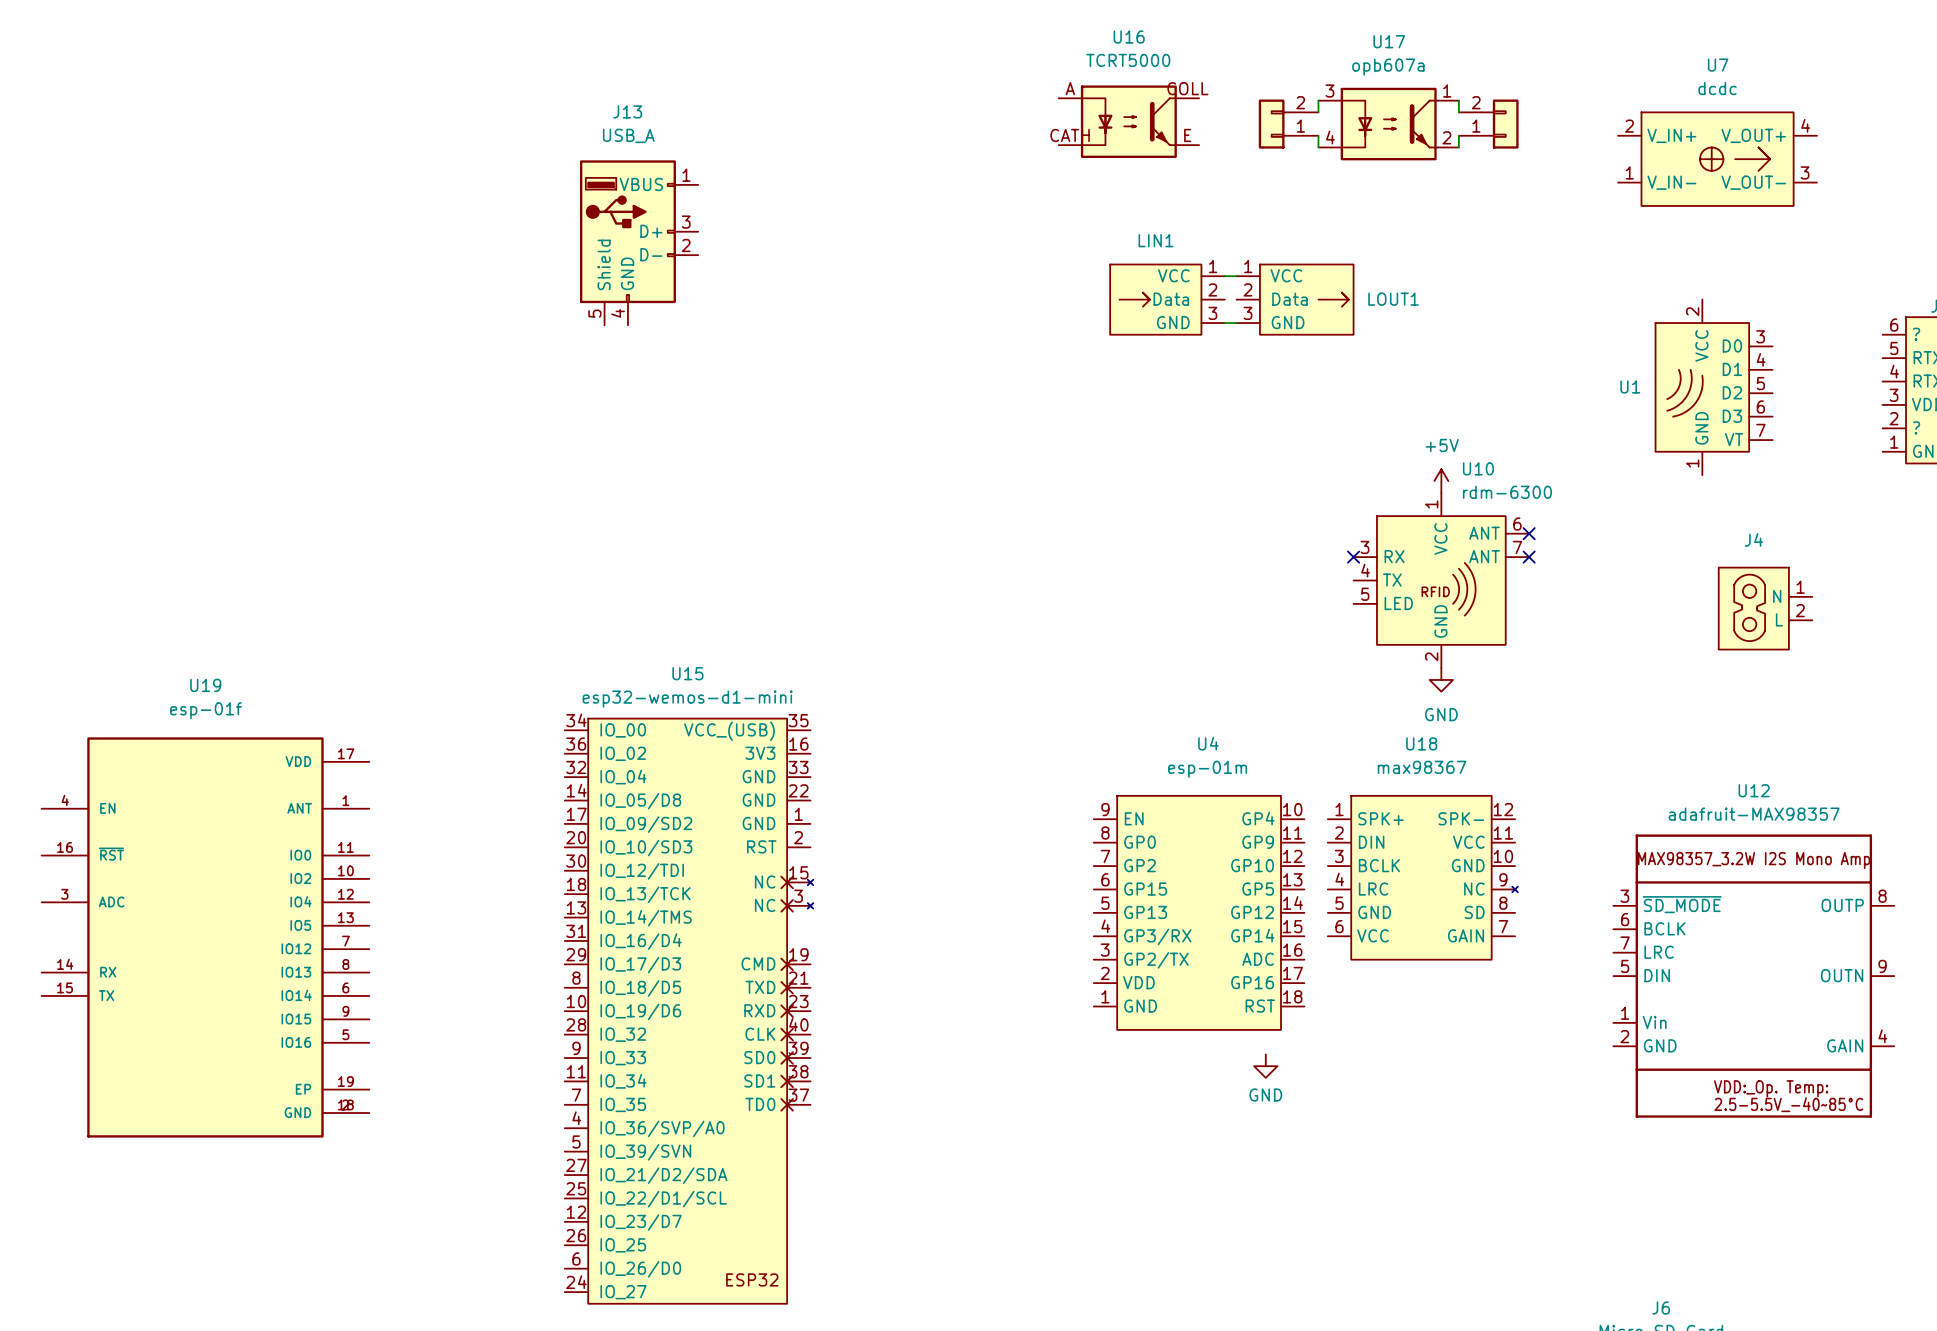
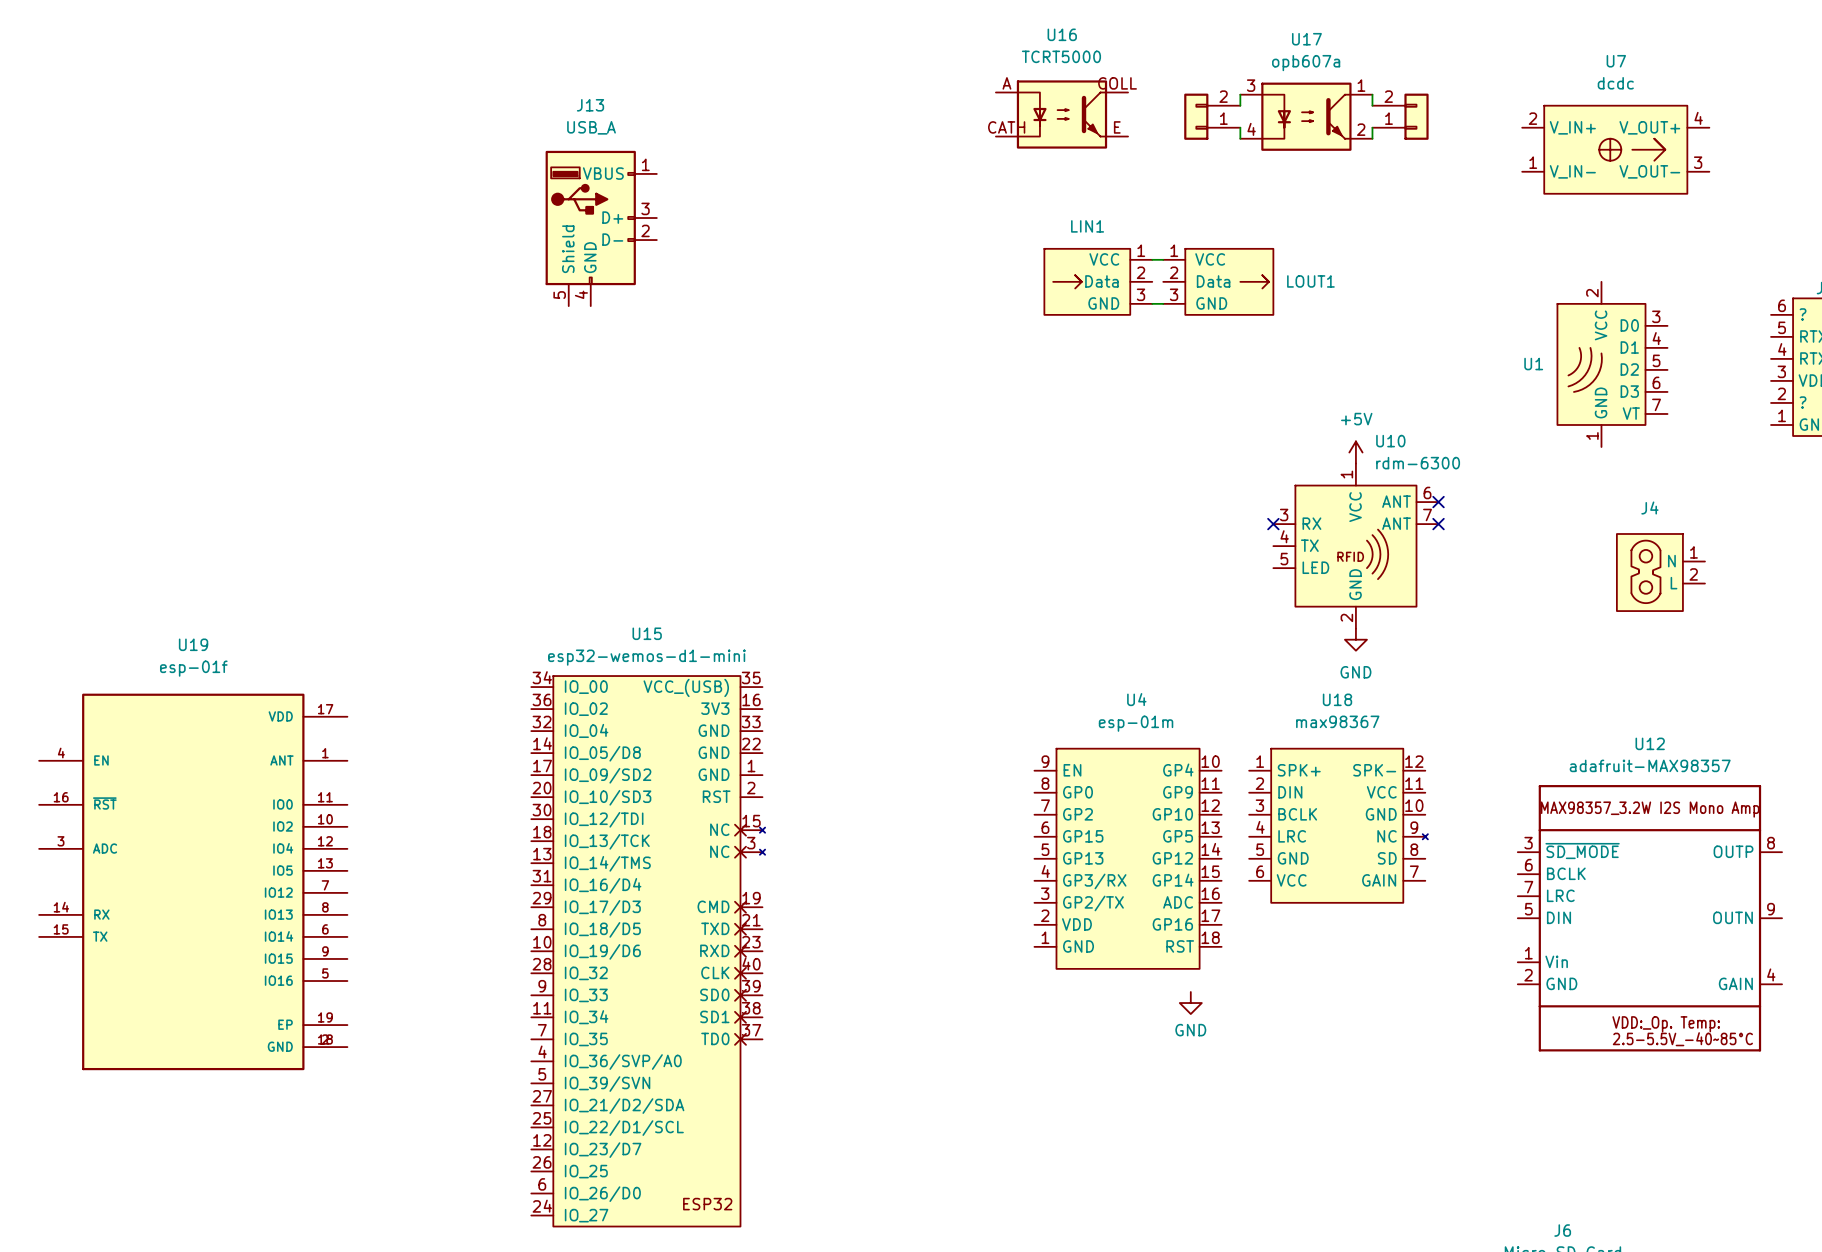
U4 symbol: [1093, 795, 1305, 1030] -> [1034, 748, 1222, 969]

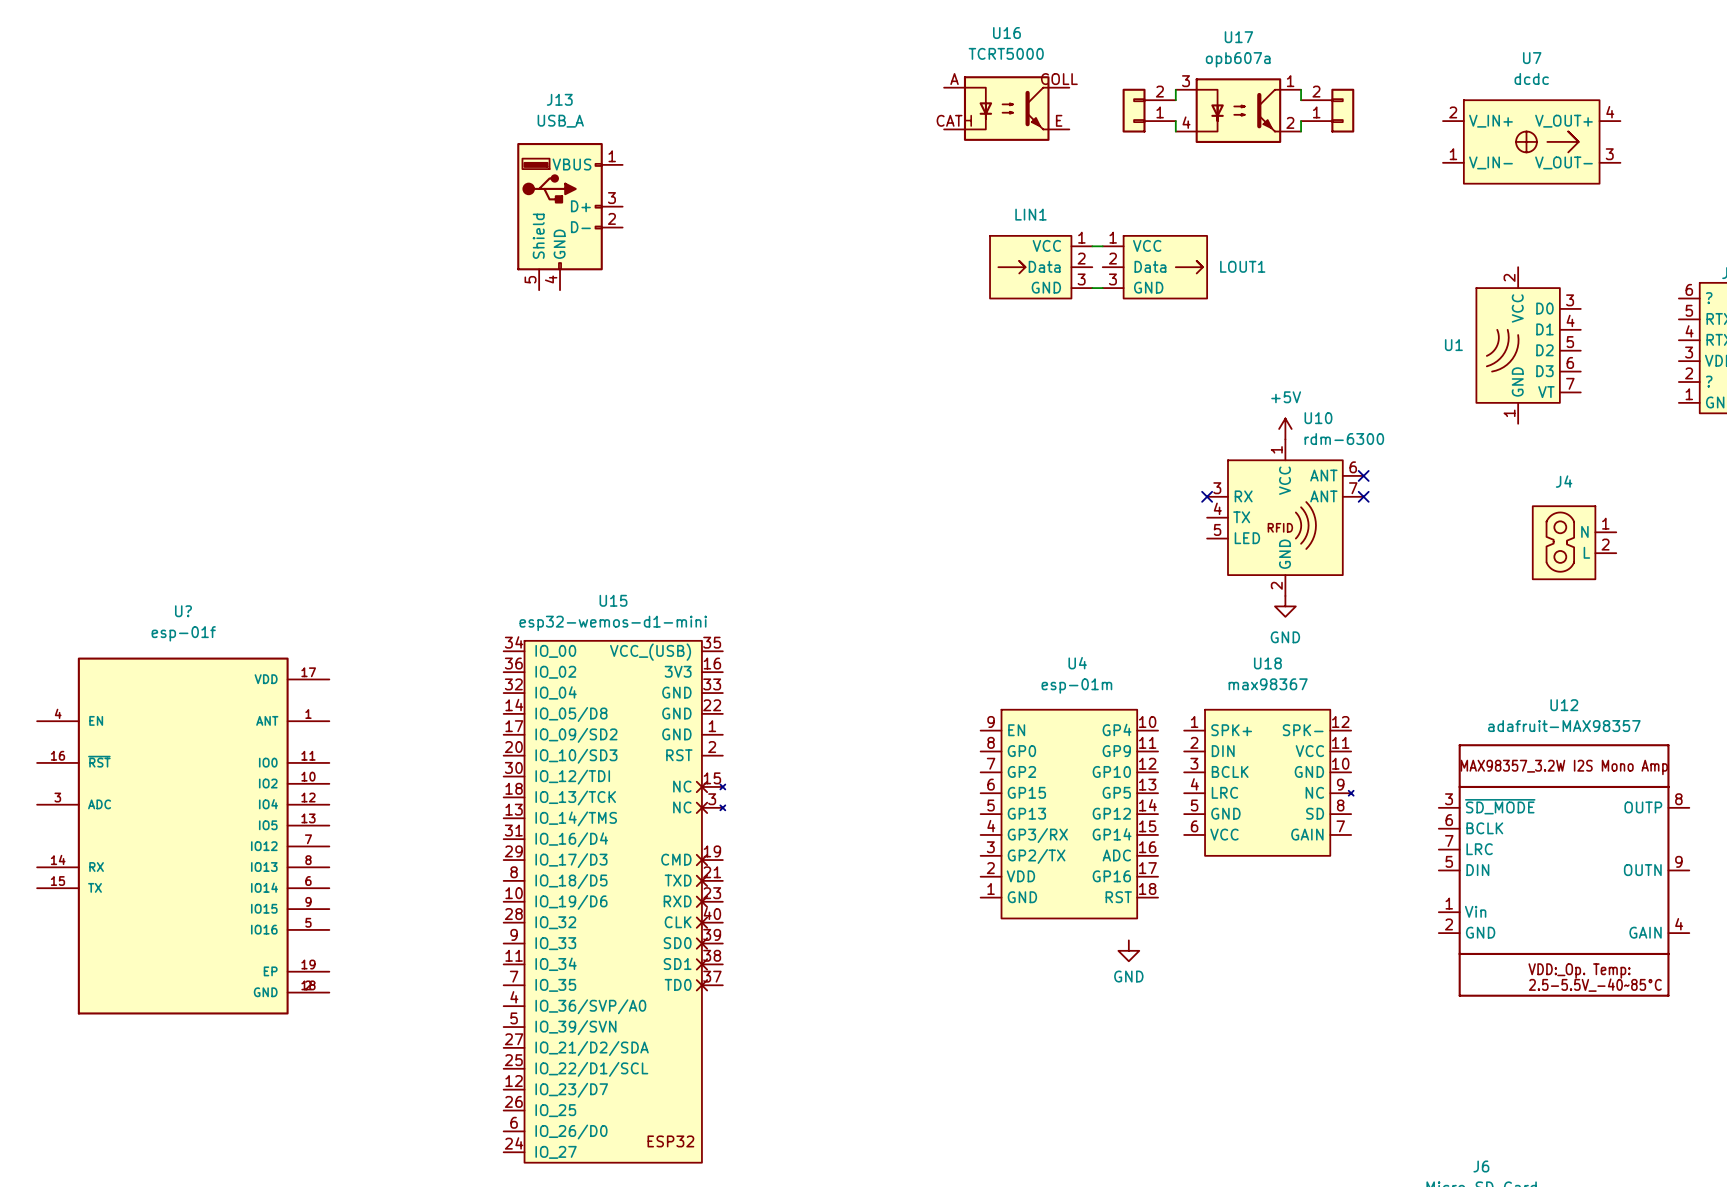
U19 name: U19 (193, 644) -> U? (183, 611)

